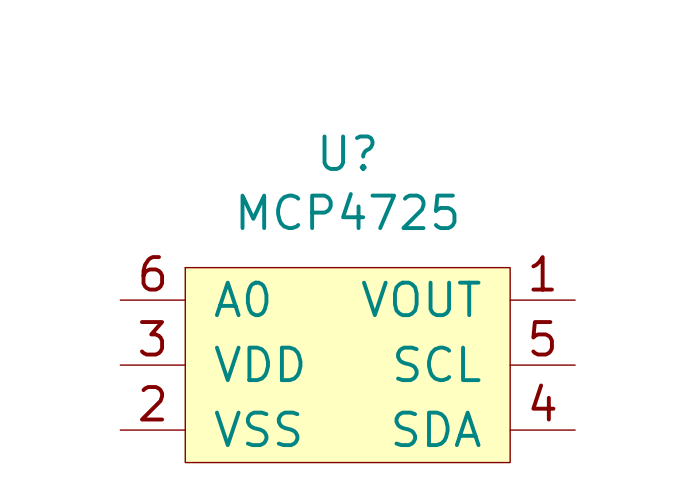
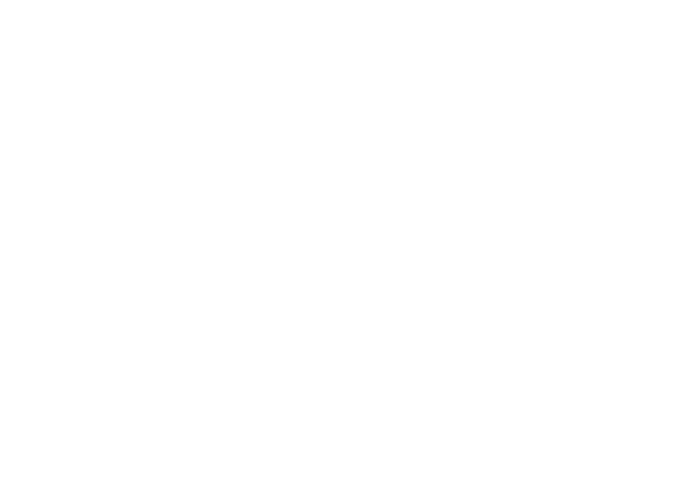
U?: MCP4725 (347, 365) -> none

